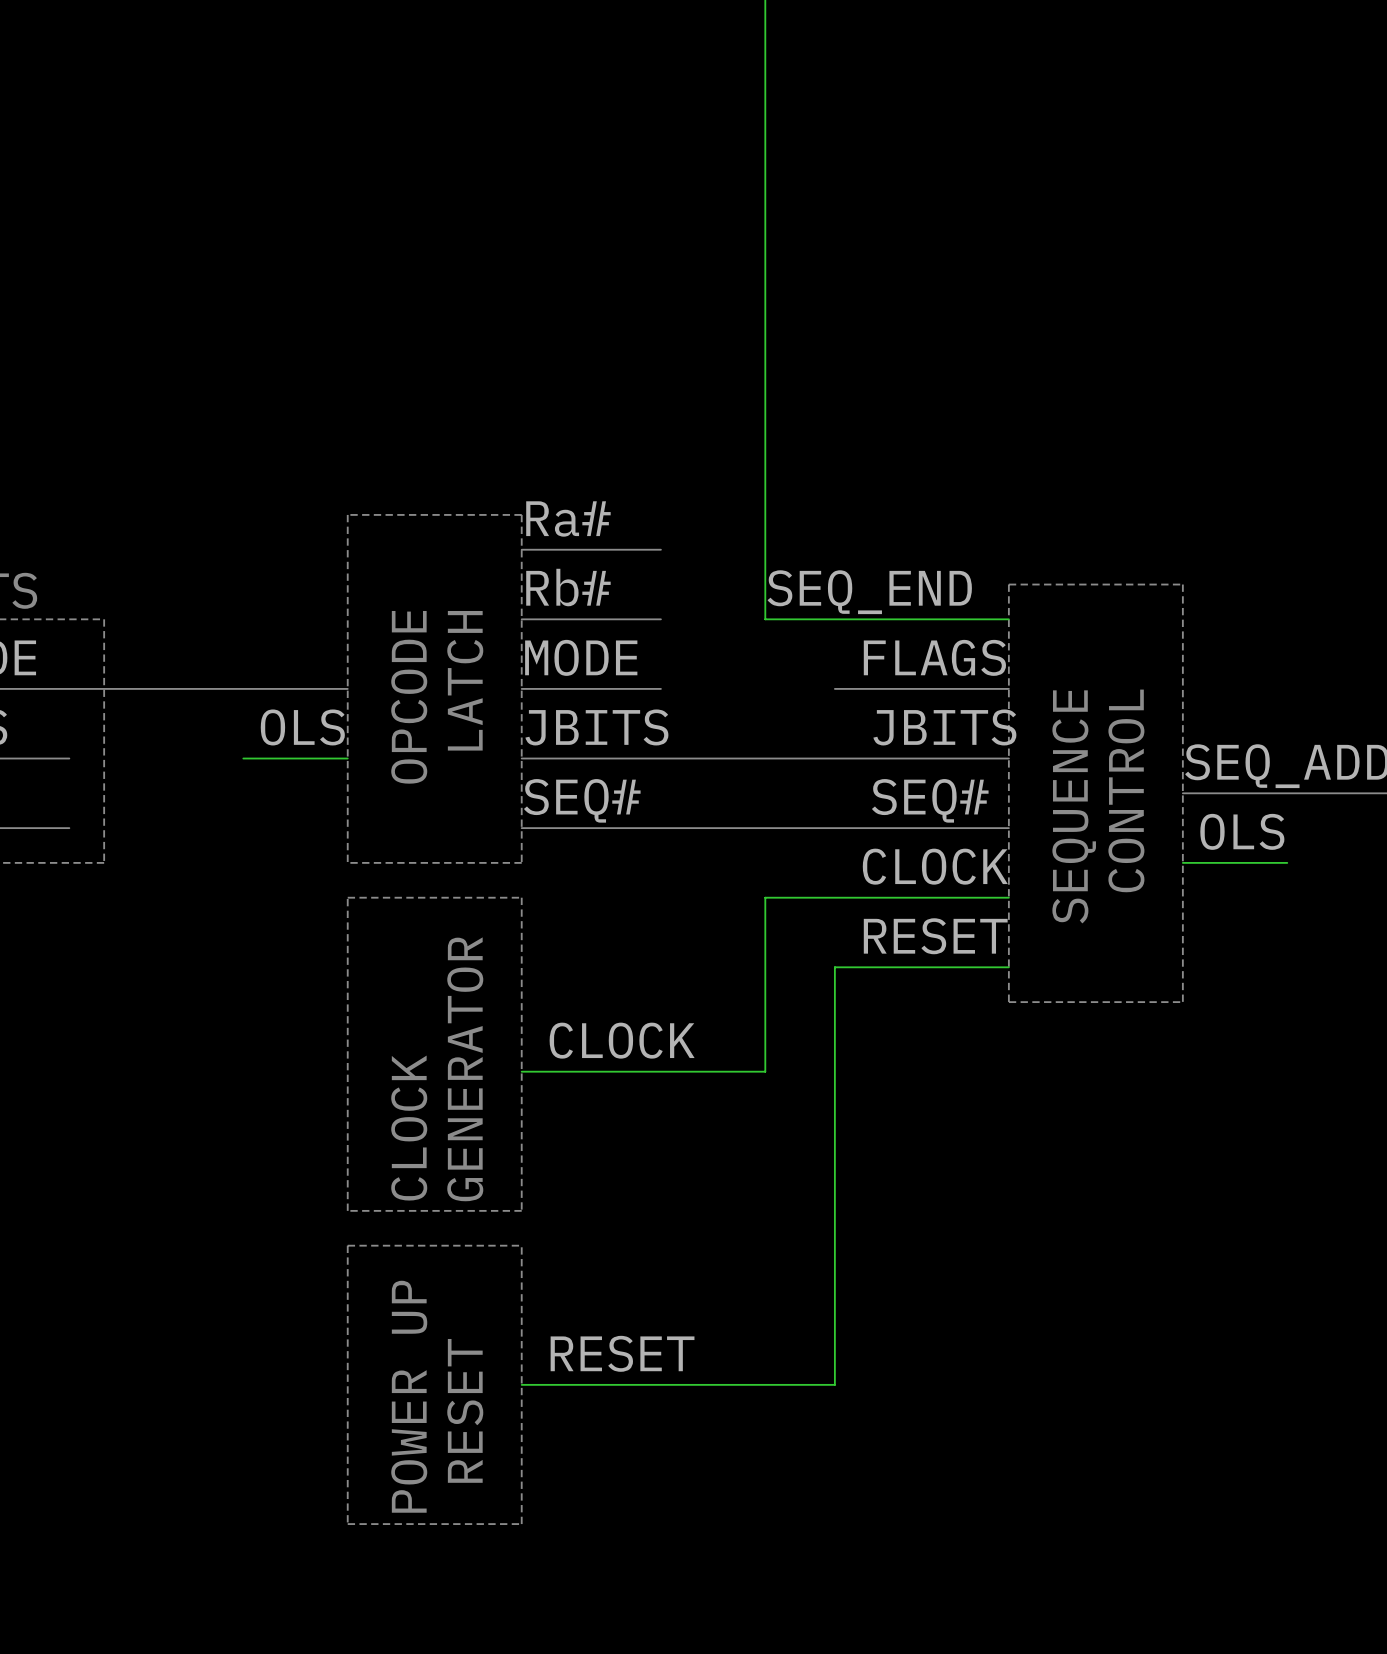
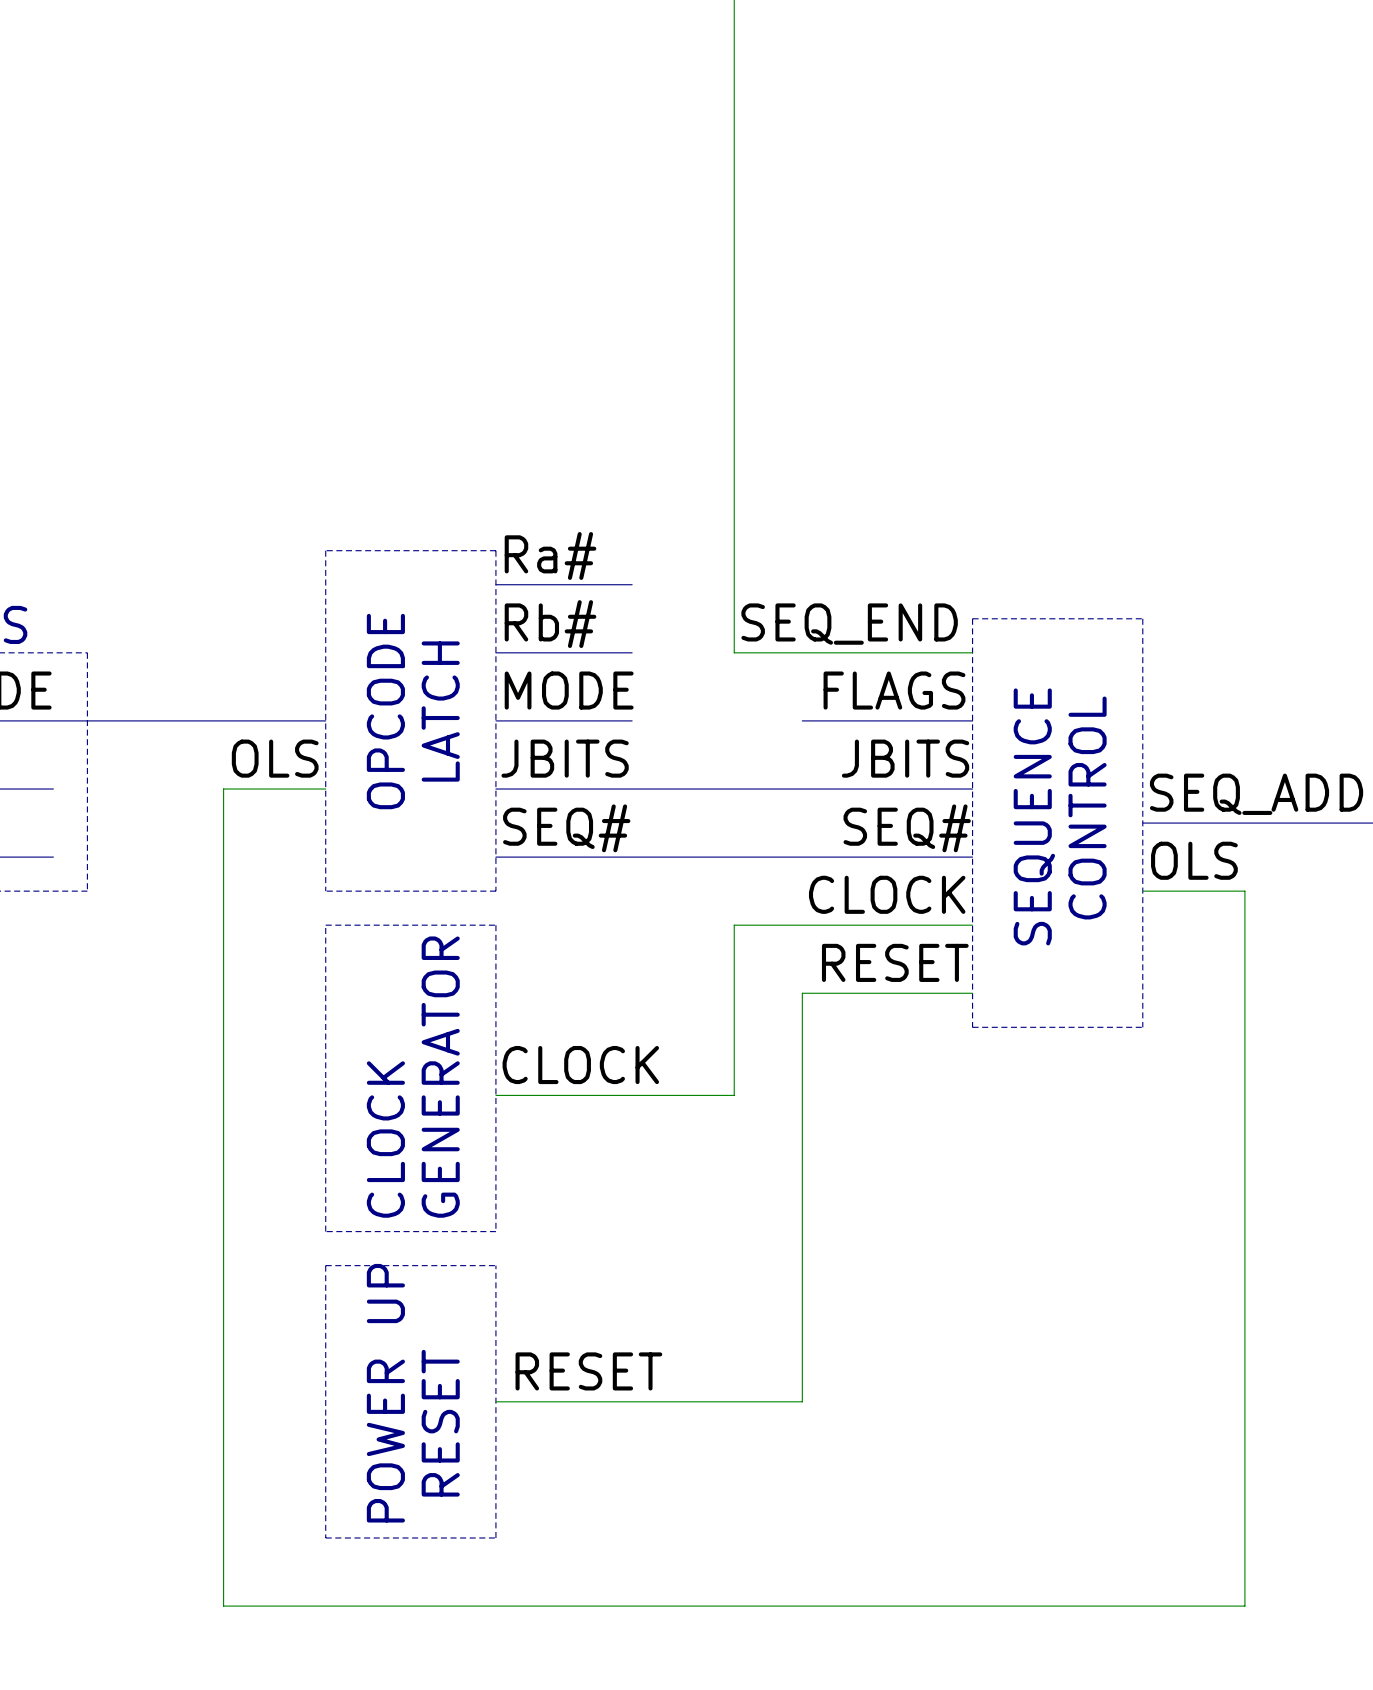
wire: none -> (223, 789) (223, 1606) (1244, 1606) (1244, 891)

